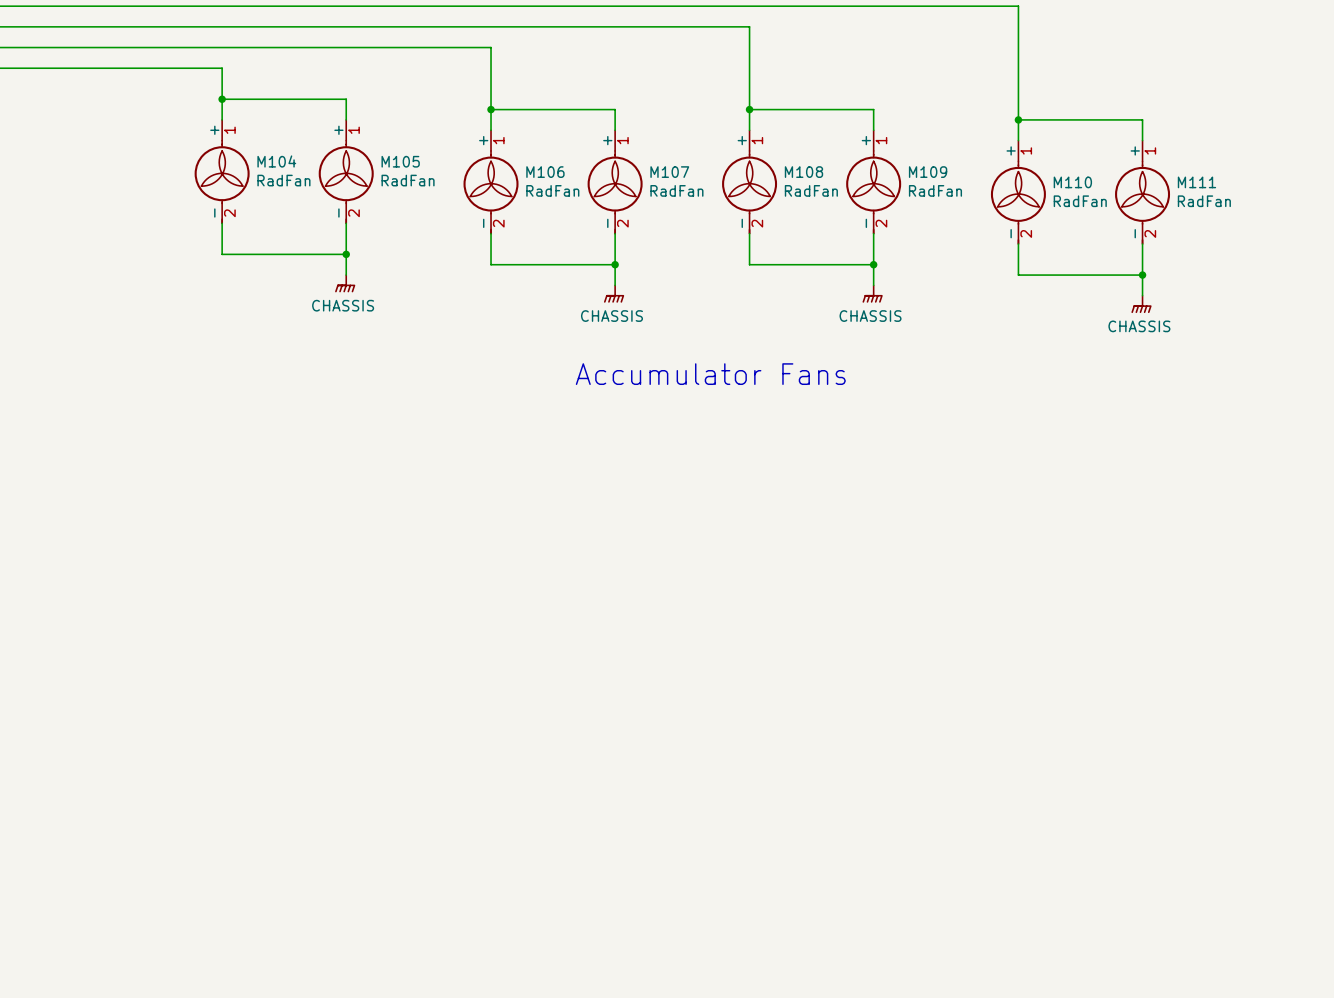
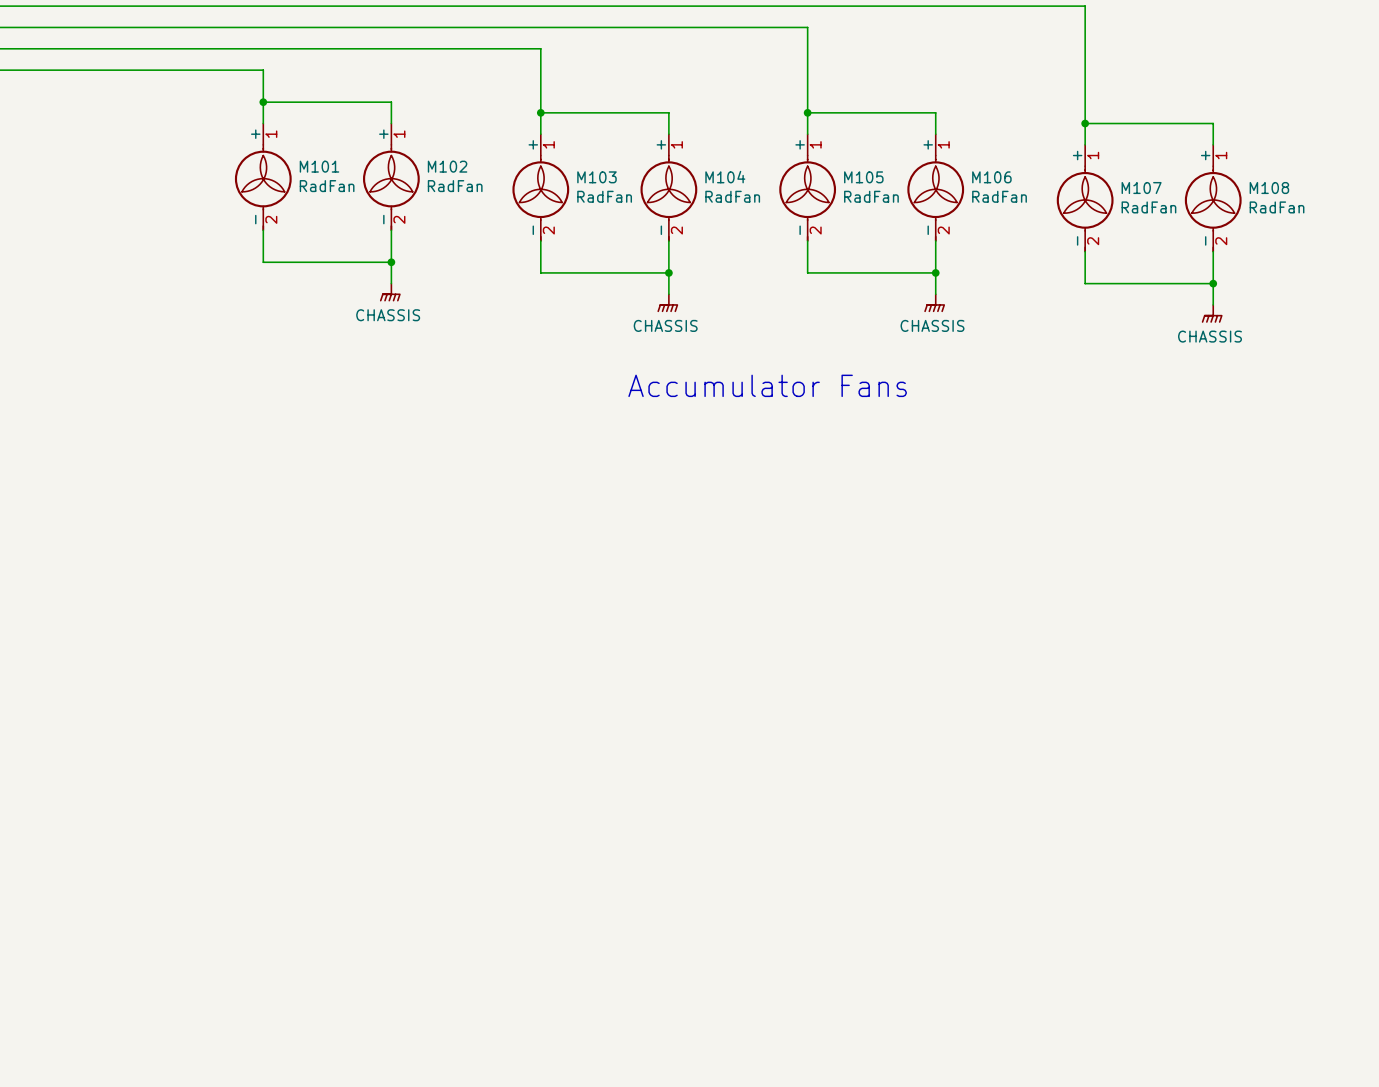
M104 name: M104 (276, 161) -> M101 (319, 166)
M105 name: M105 (400, 161) -> M102 (447, 166)
M106 name: M106 (545, 172) -> M103 (596, 177)
M107 name: M107 (669, 172) -> M104 (725, 177)
M108 name: M108 (803, 172) -> M105 (863, 177)
M109 name: M109 (928, 172) -> M106 (991, 177)
M110 name: M110 (1072, 182) -> M107 (1141, 188)
M111 name: M111 (1196, 182) -> M108 (1269, 188)

